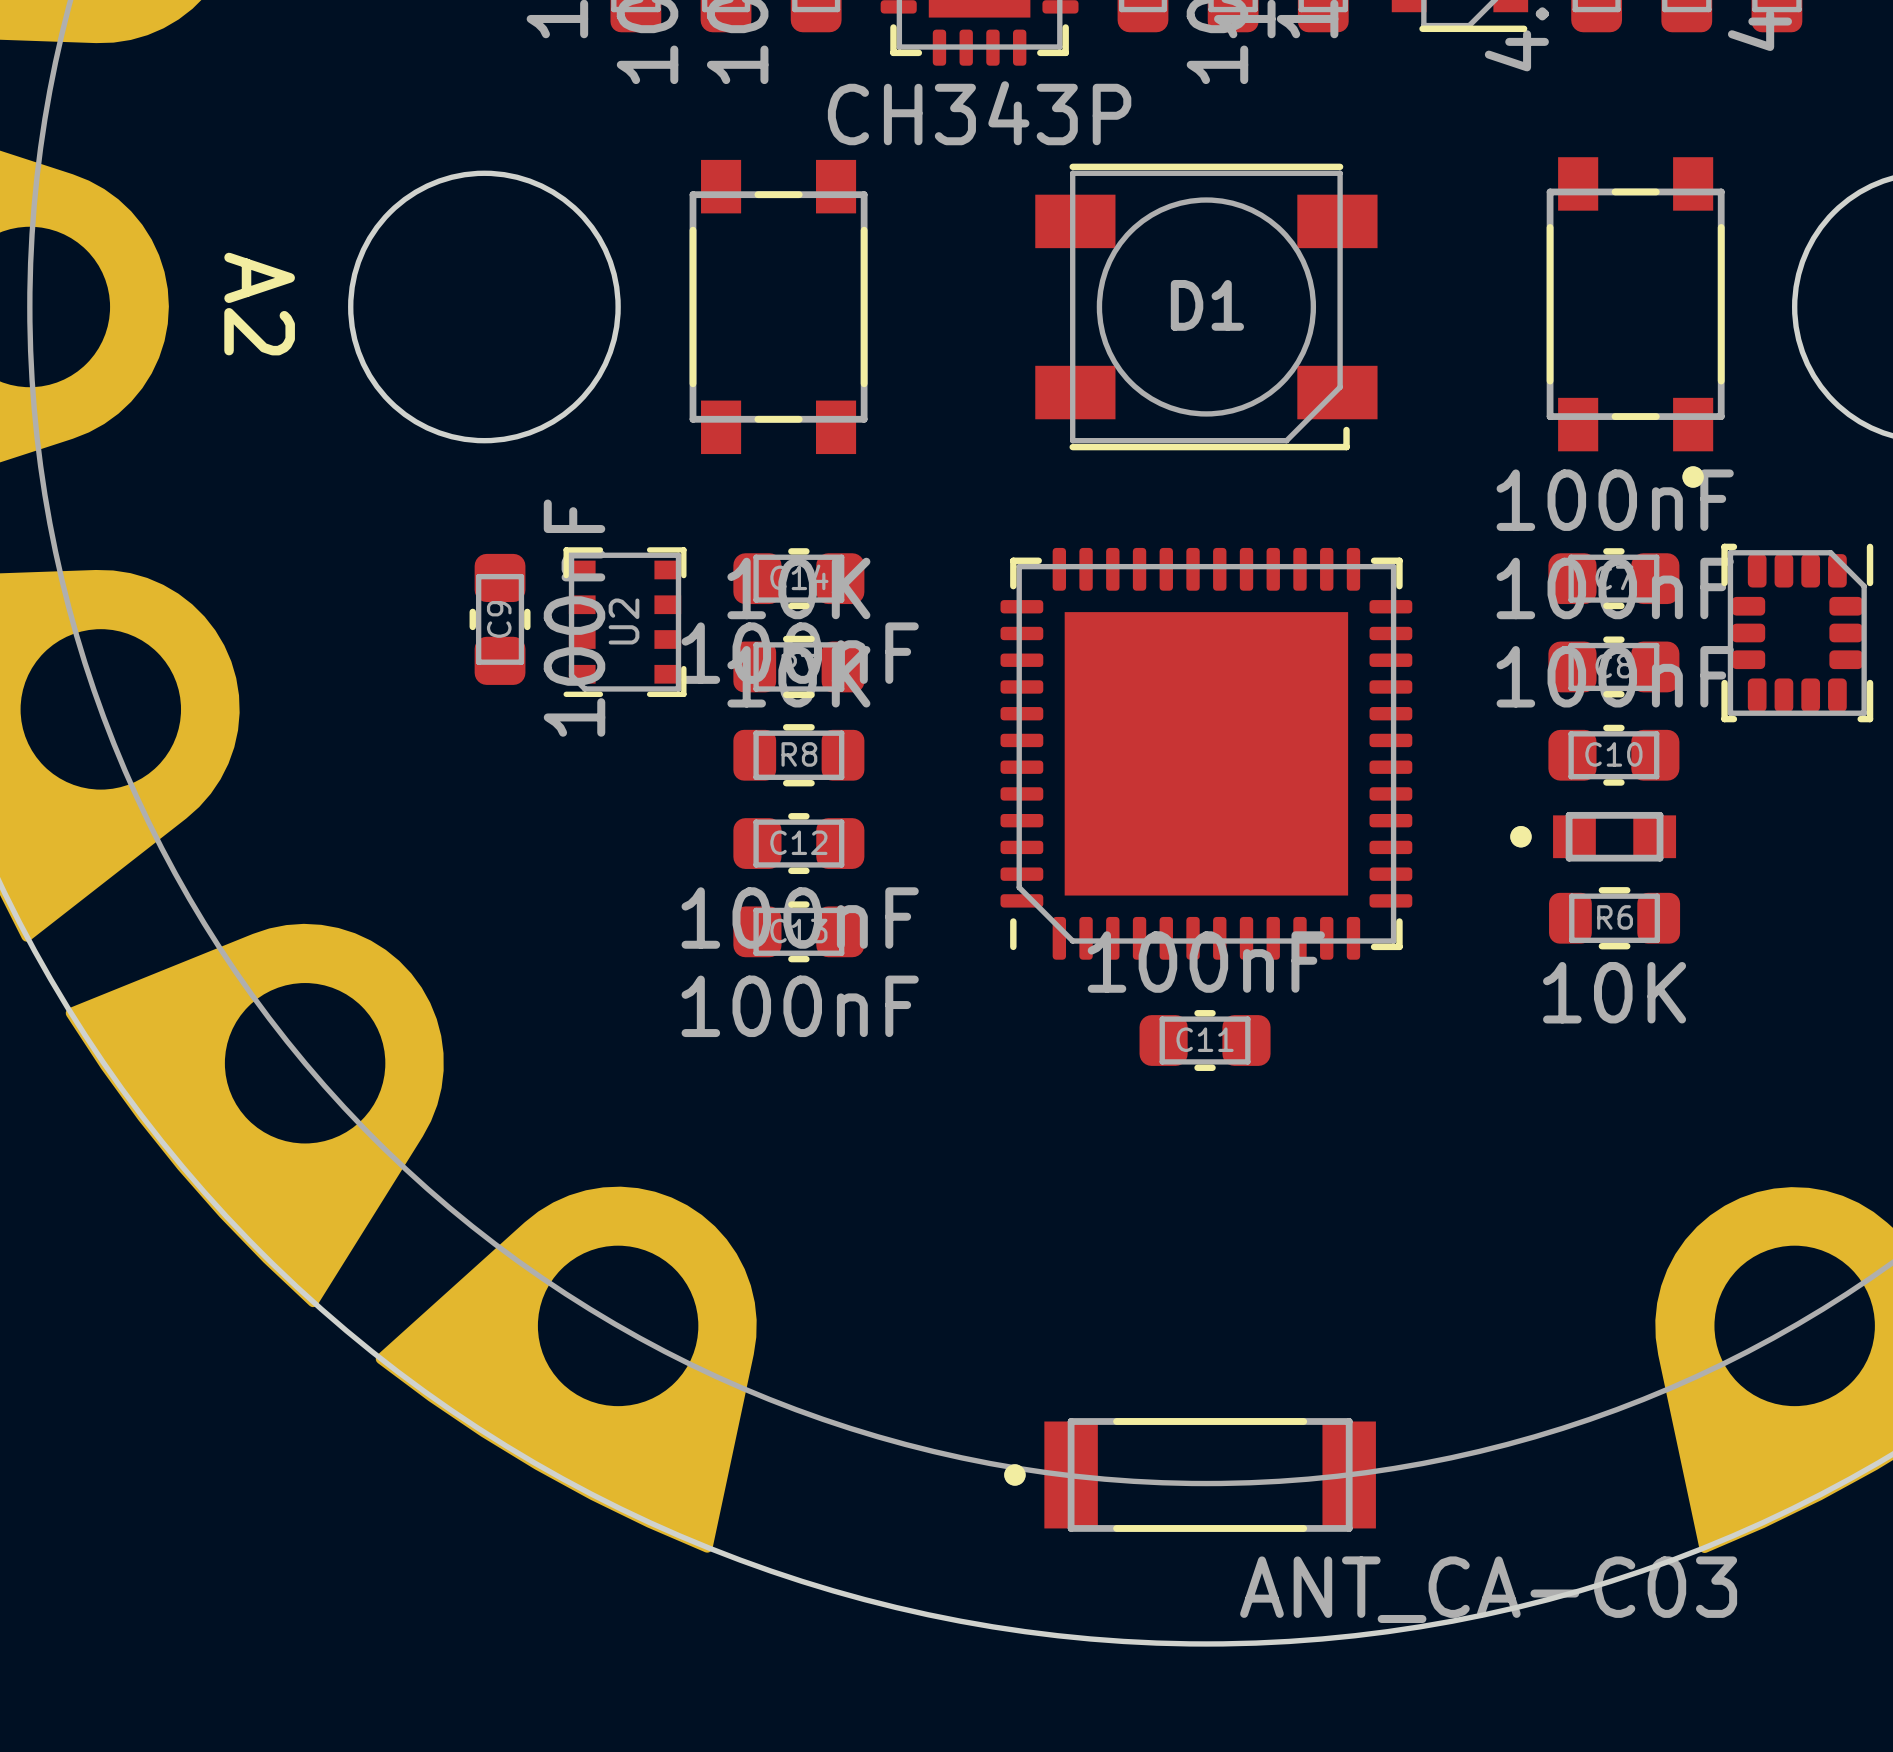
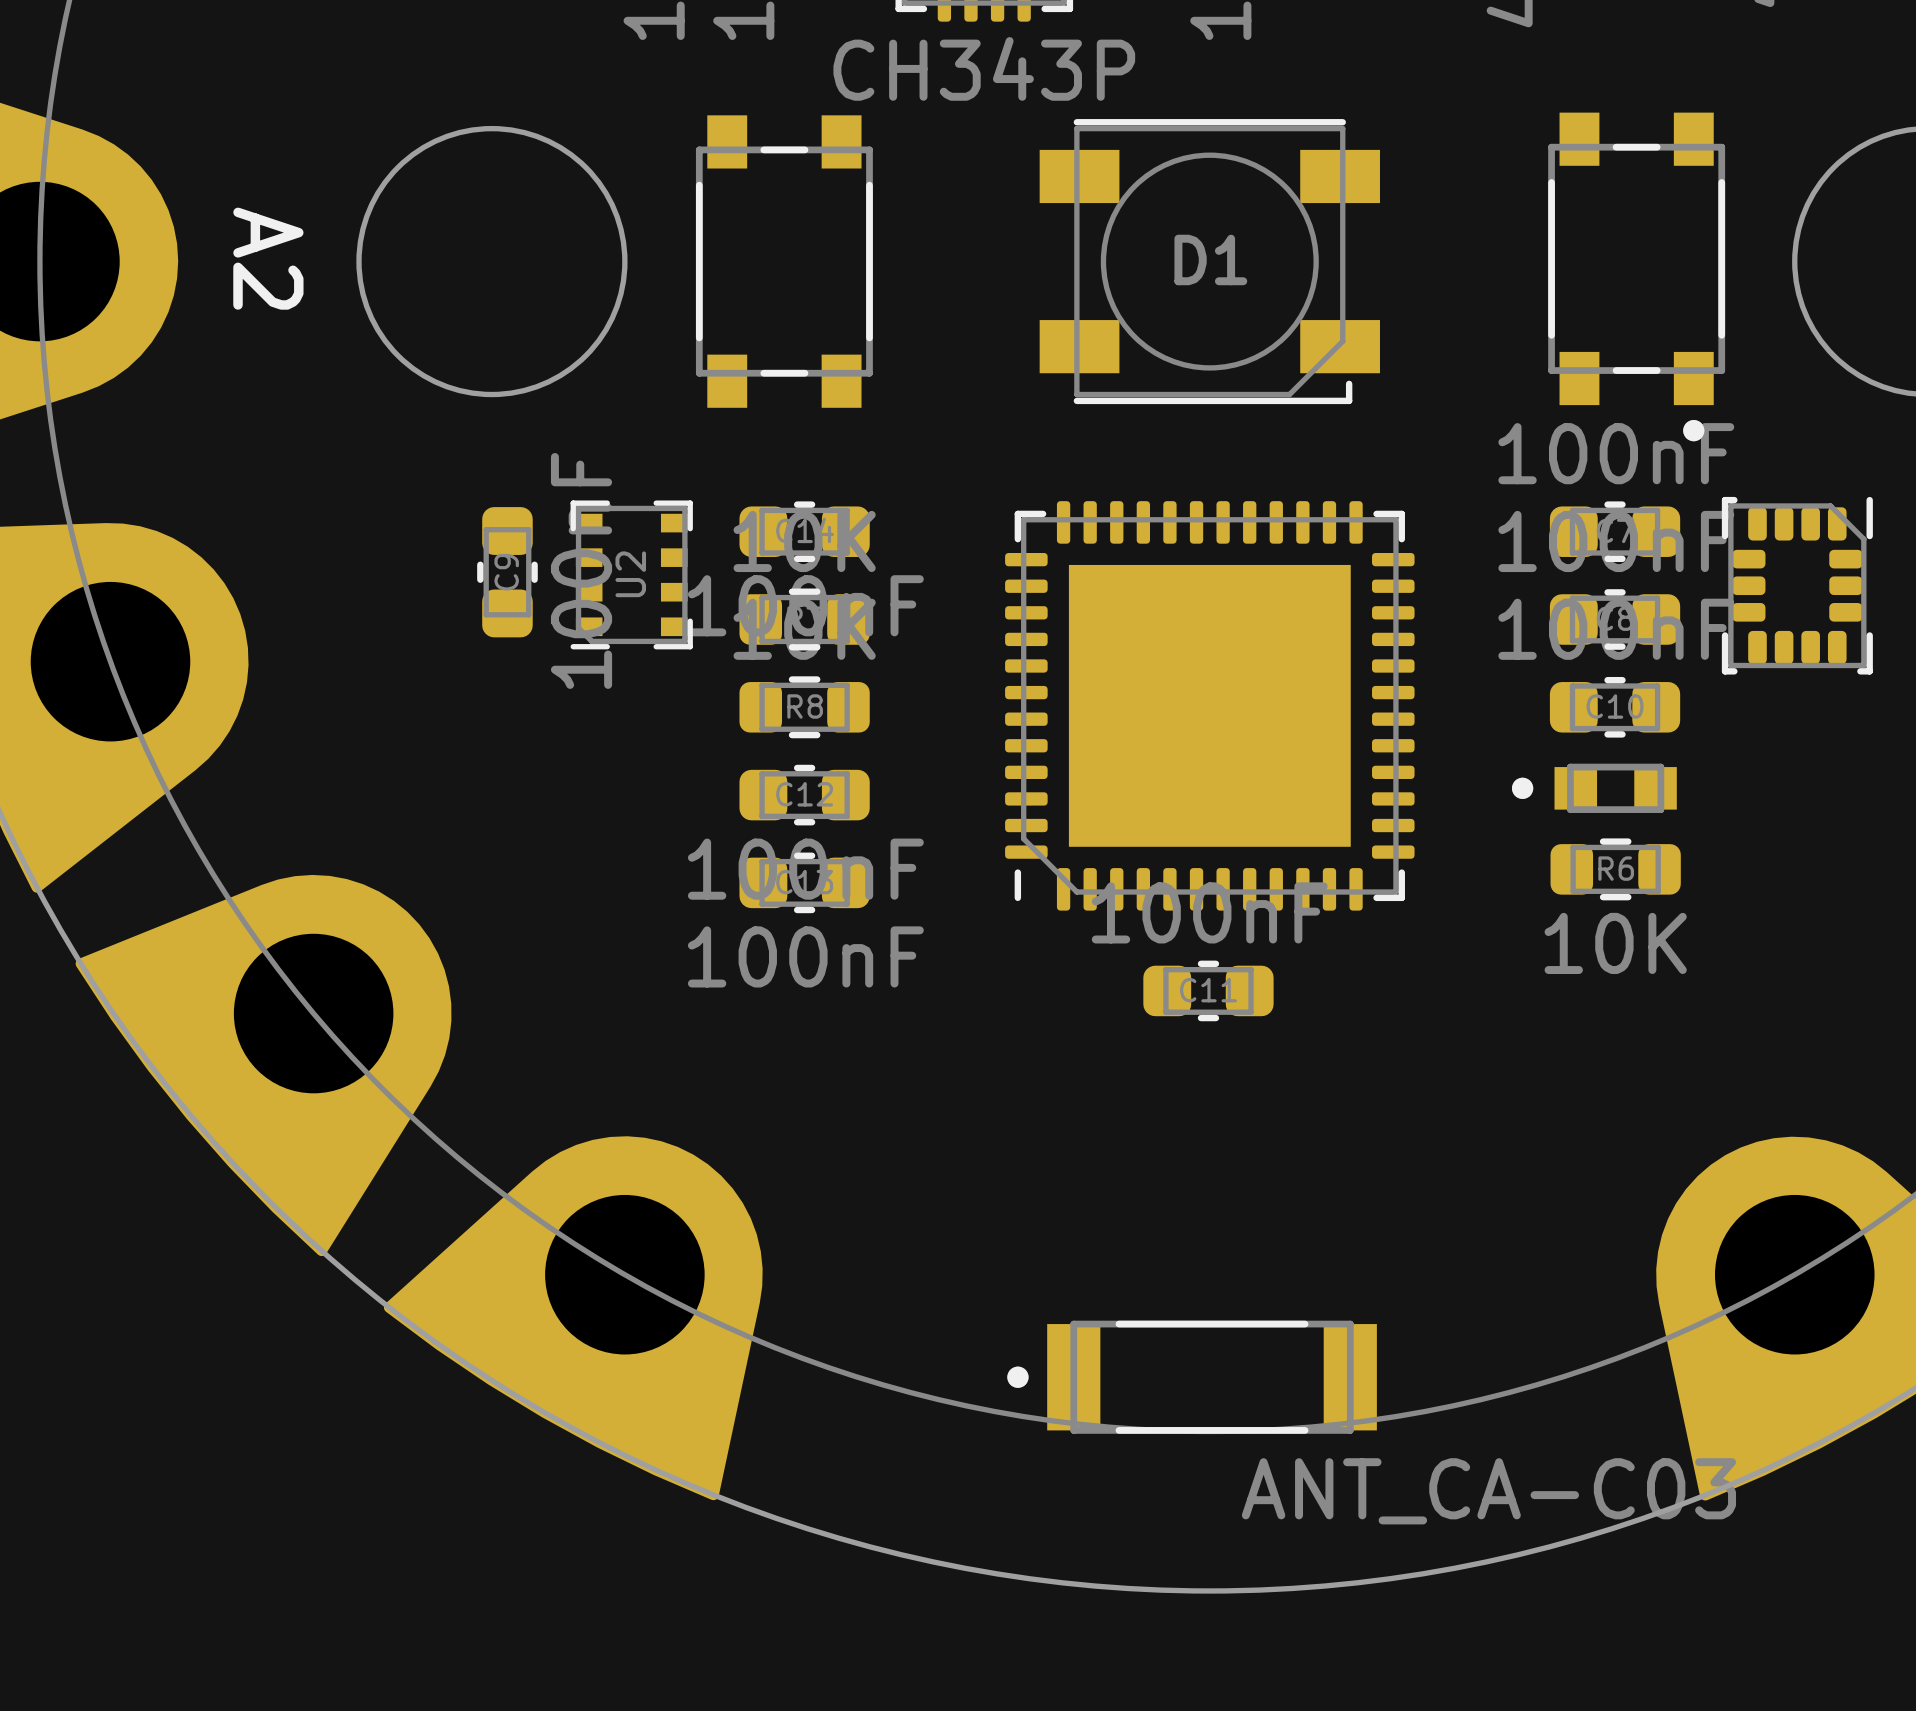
part position: (1190, 1474) -> (1192, 1377)

